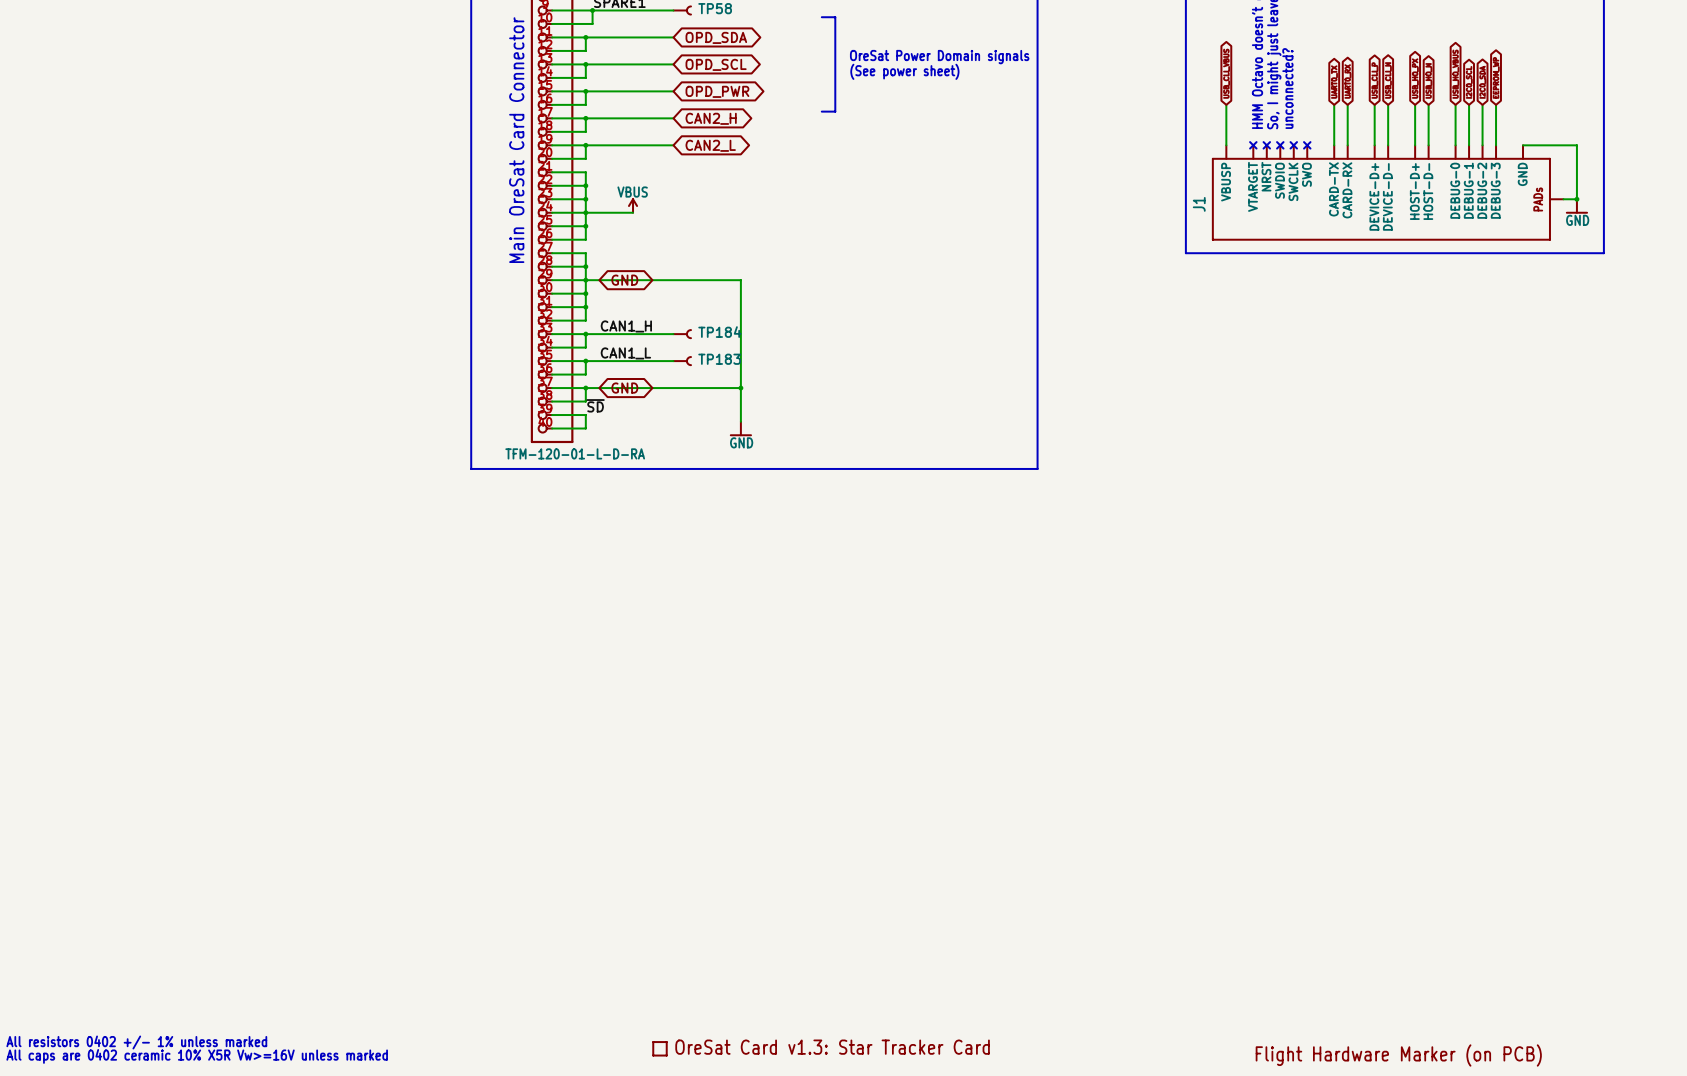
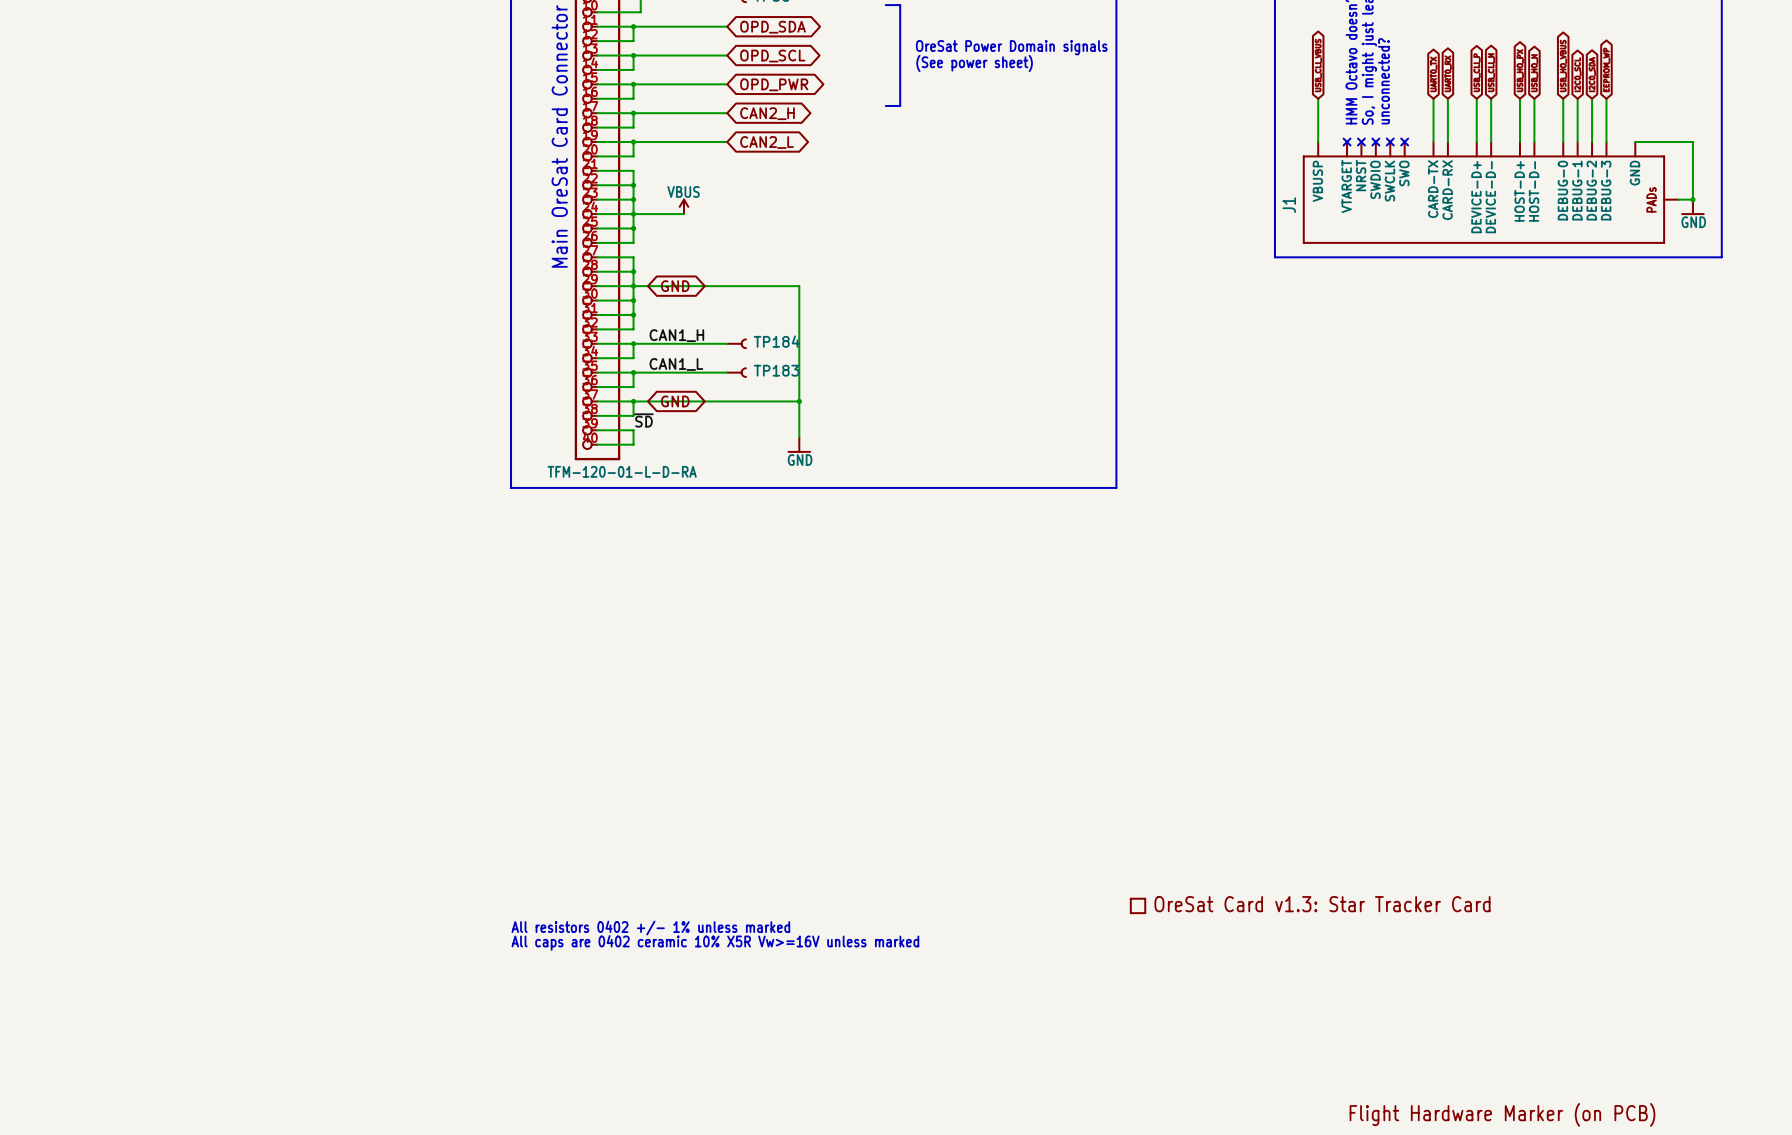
part: none -> (1138, 905)
text: none -> All resistors 0402 +/- 1% unless marked (650, 928)
text: none -> All caps are 0402 ceramic 10% X5R Vw>=16V unless marked (715, 942)
text: All resistors 0402 +/- 1% unless marked (136, 1042) -> none
part: (659, 1048) -> none
text: All caps are 0402 ceramic 10% X5R Vw>=16V unless marked (197, 1056) -> none

